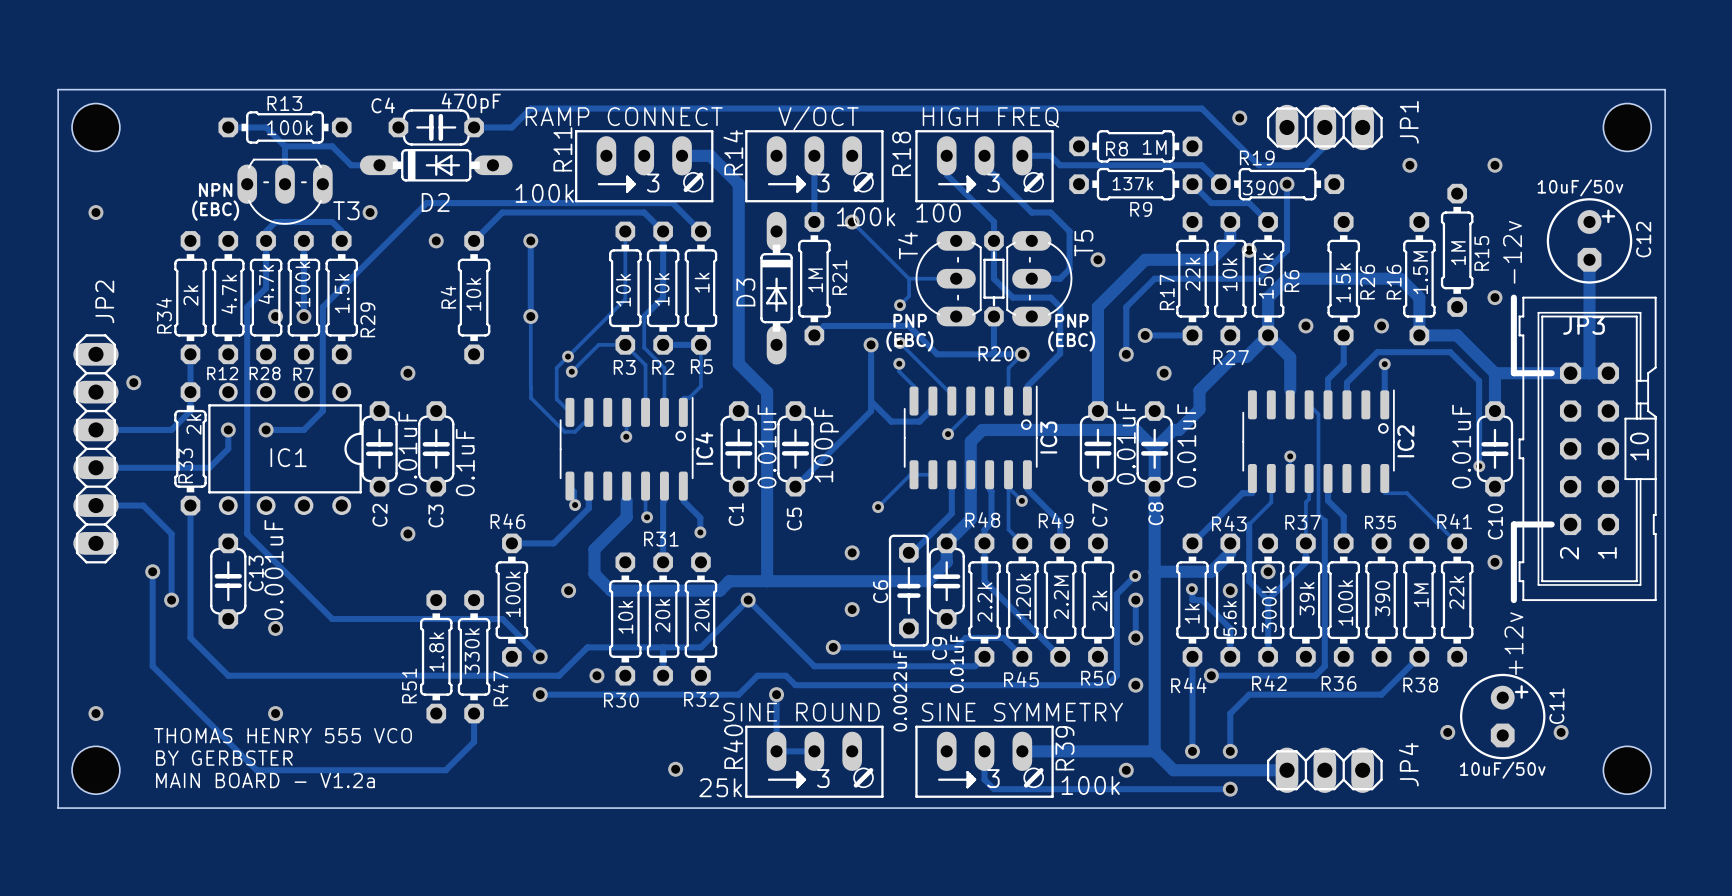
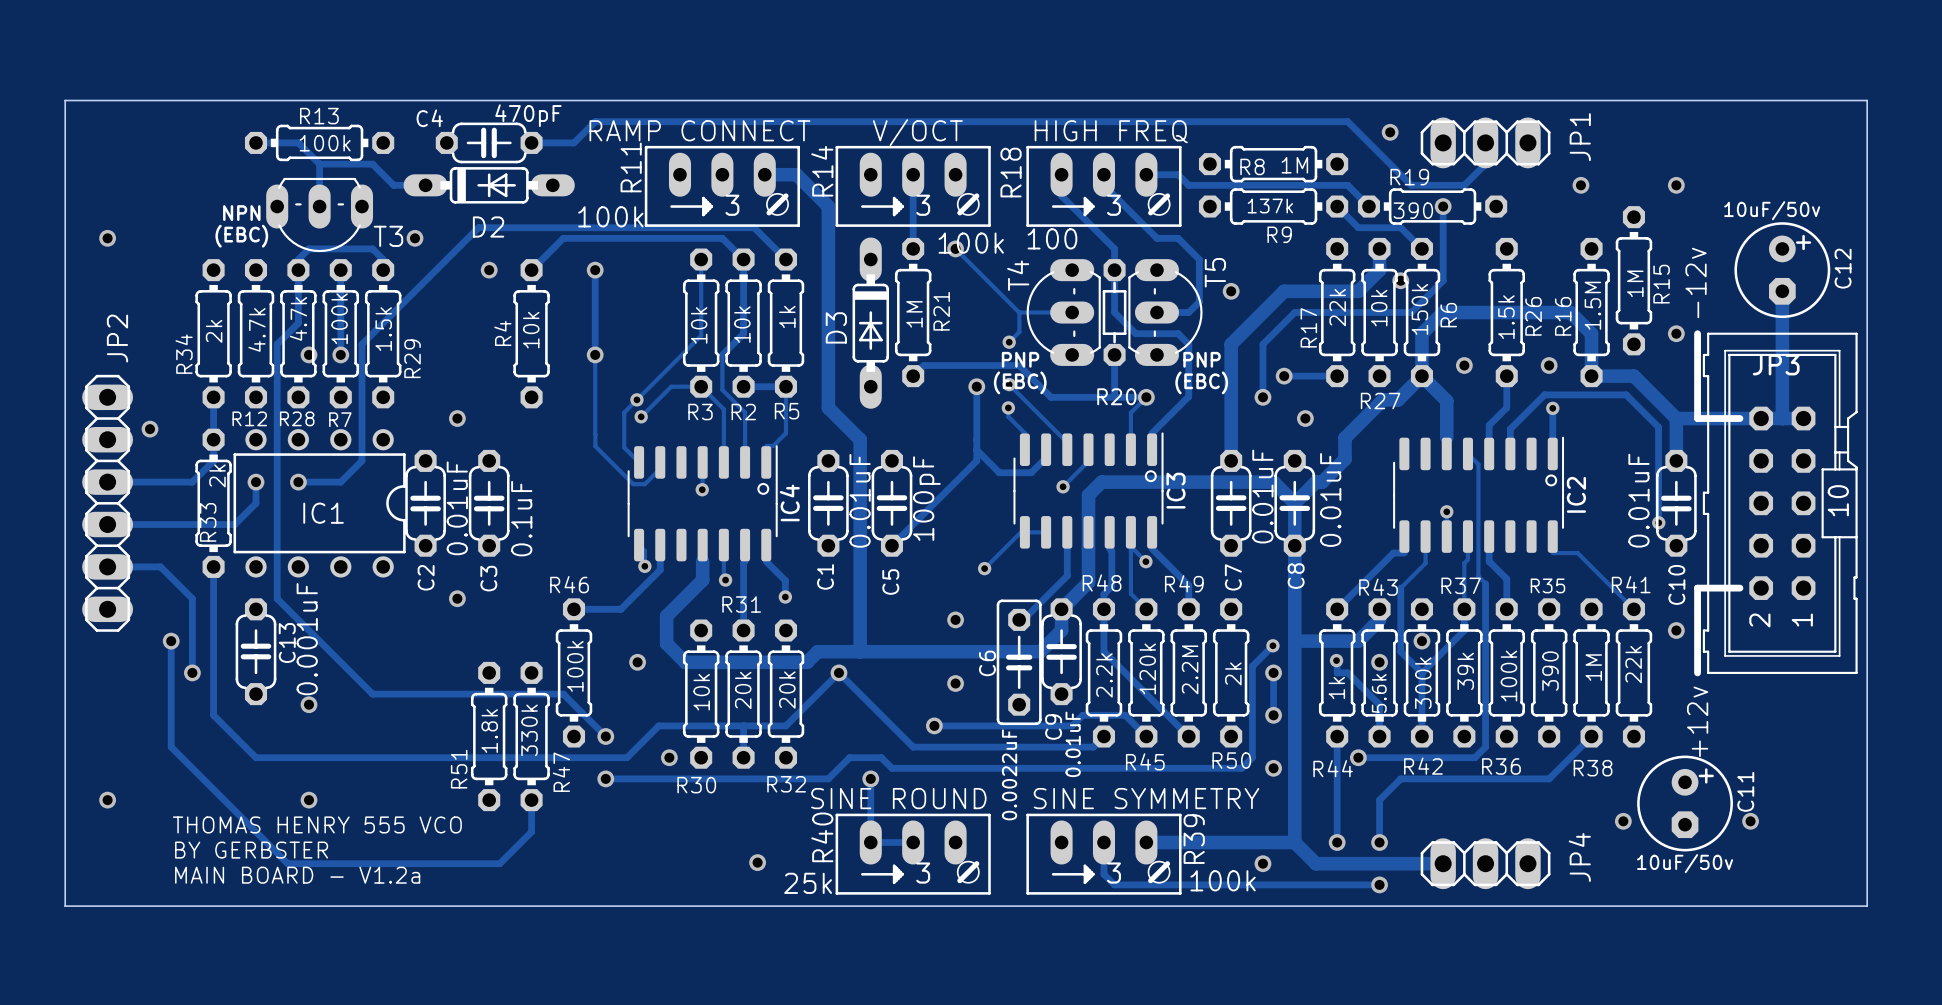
part: (95, 127) -> none
part: (1627, 127) -> none
part: (95, 770) -> none
part: (1627, 770) -> none

